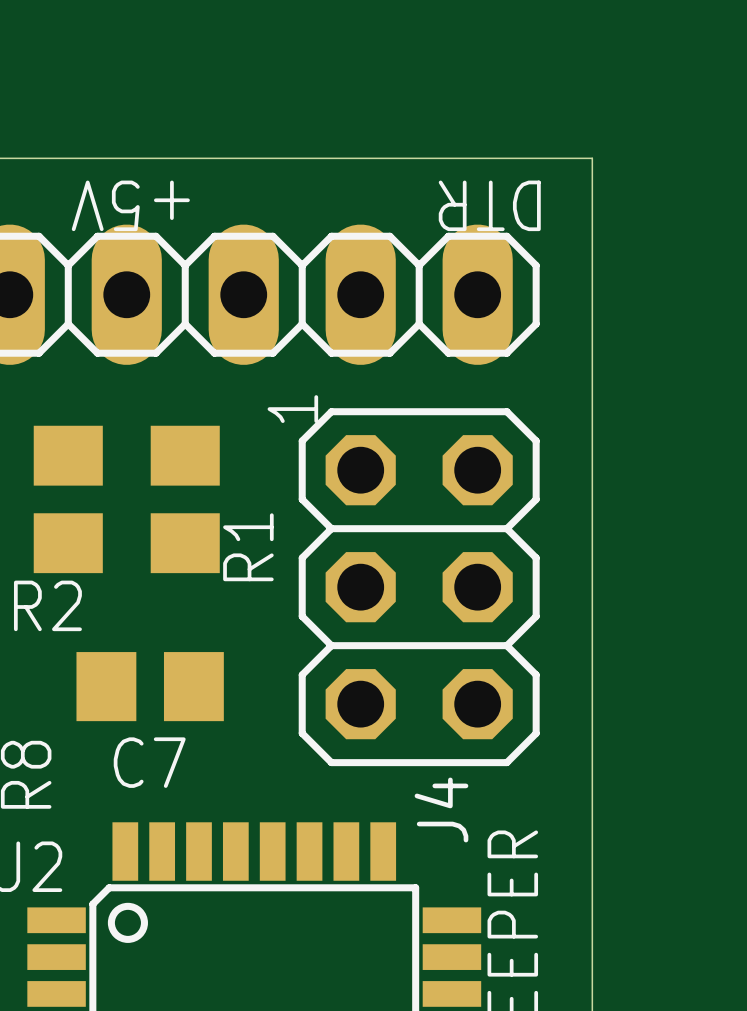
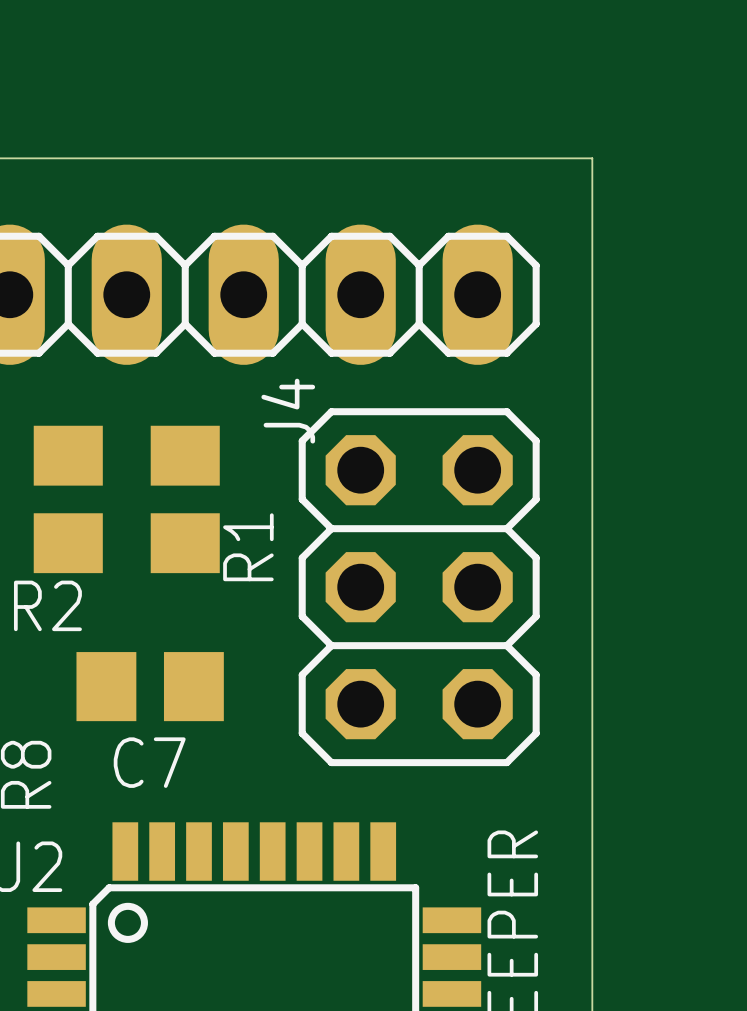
text: +5V (130, 205) -> none
text: DTR (489, 205) -> none
text: 1 (292, 409) -> none
J4 name position: J4 (441, 809) -> J4 (288, 411)

